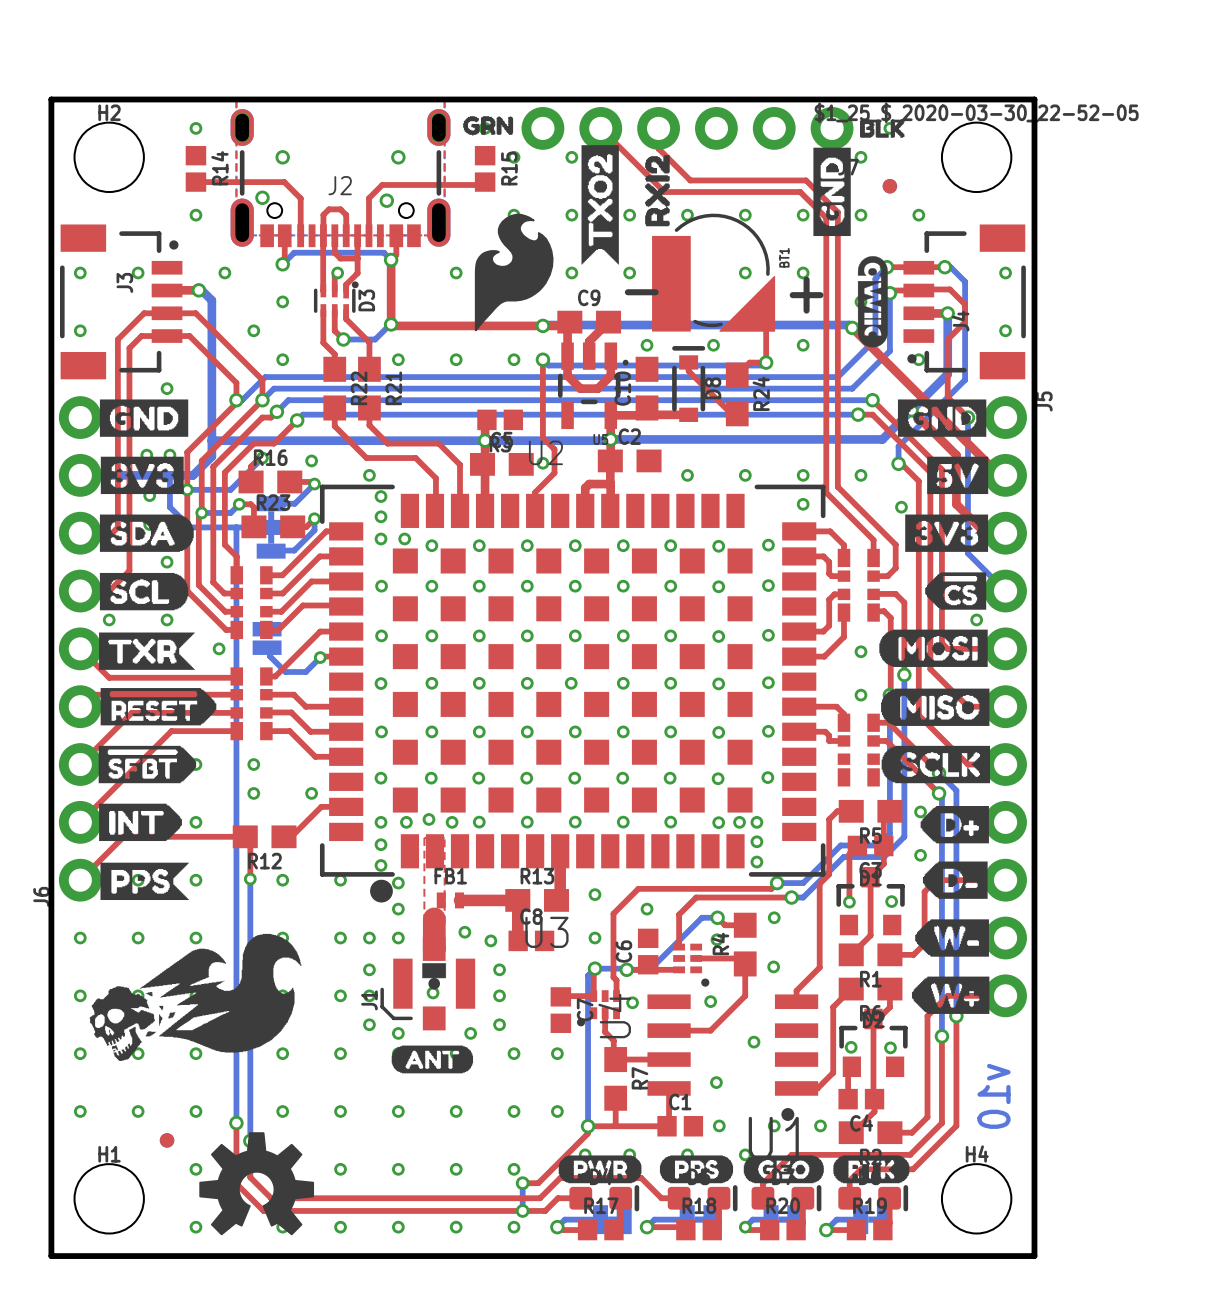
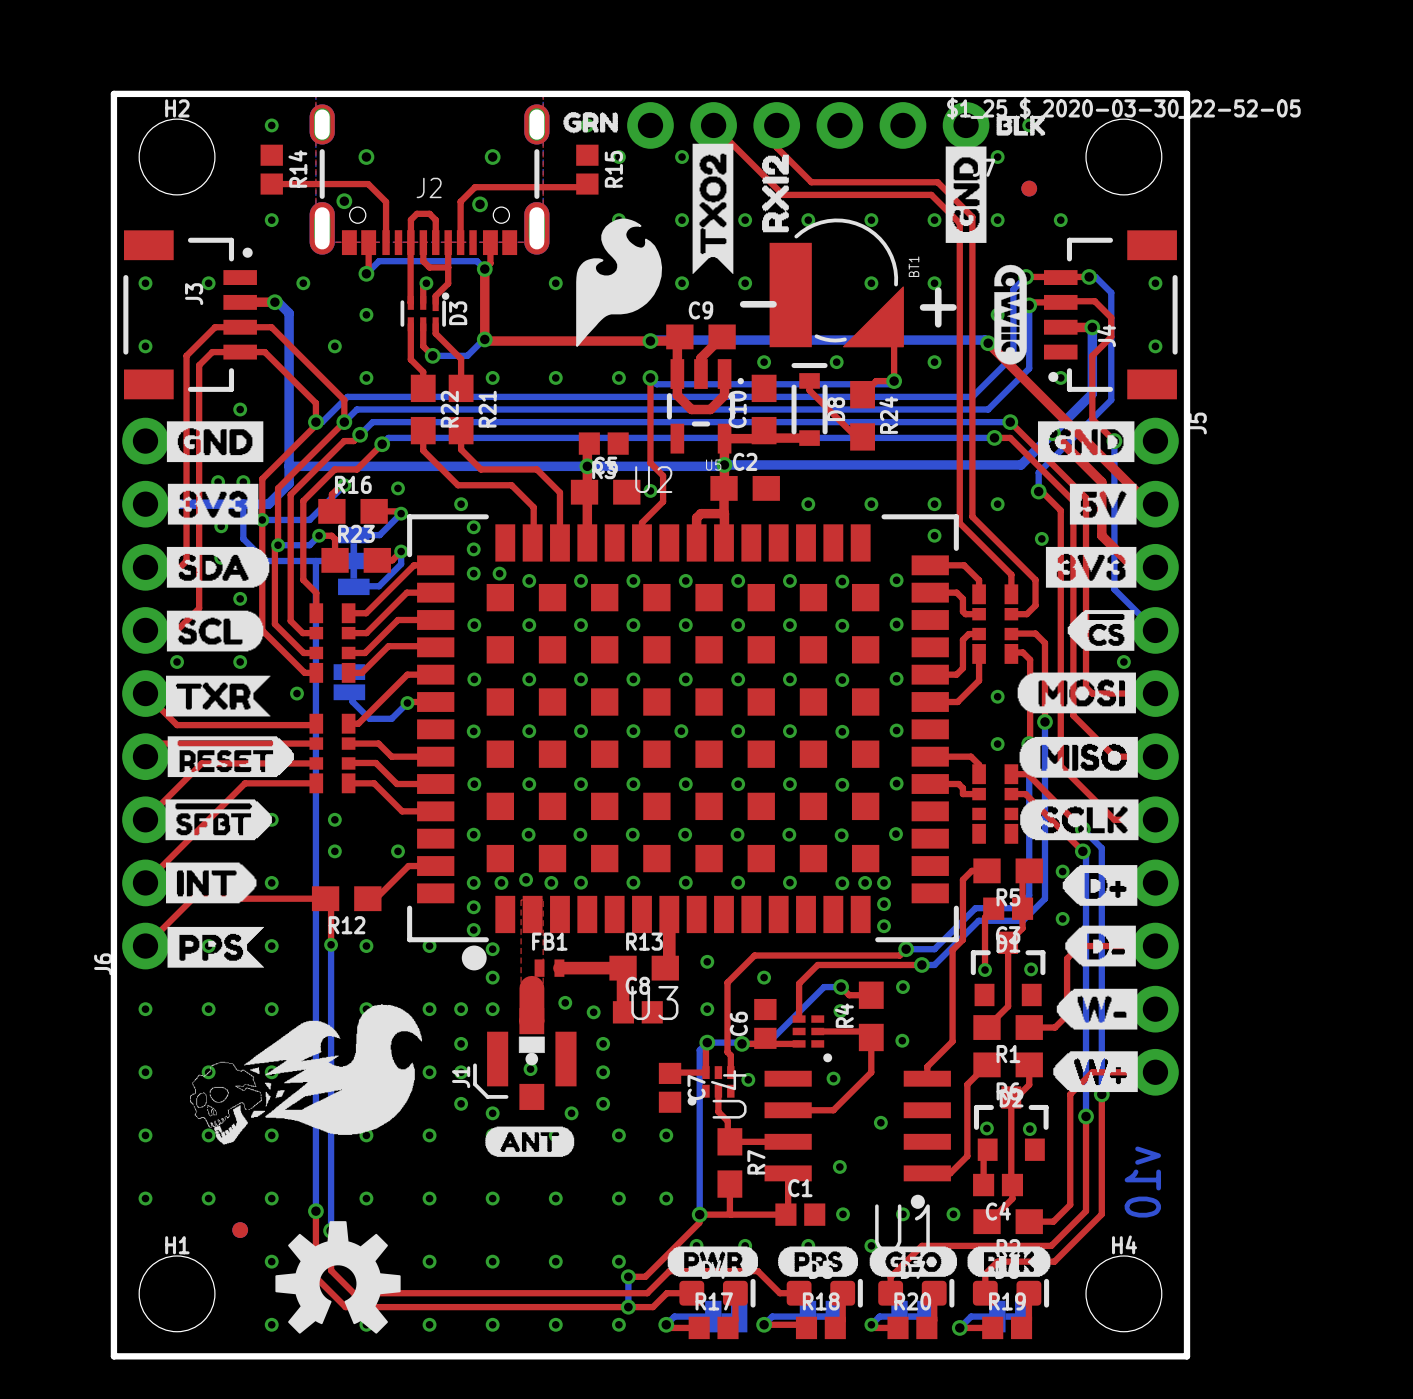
drawing: [89, 933, 302, 1061] -> none
drawing: none -> [190, 1004, 423, 1145]

